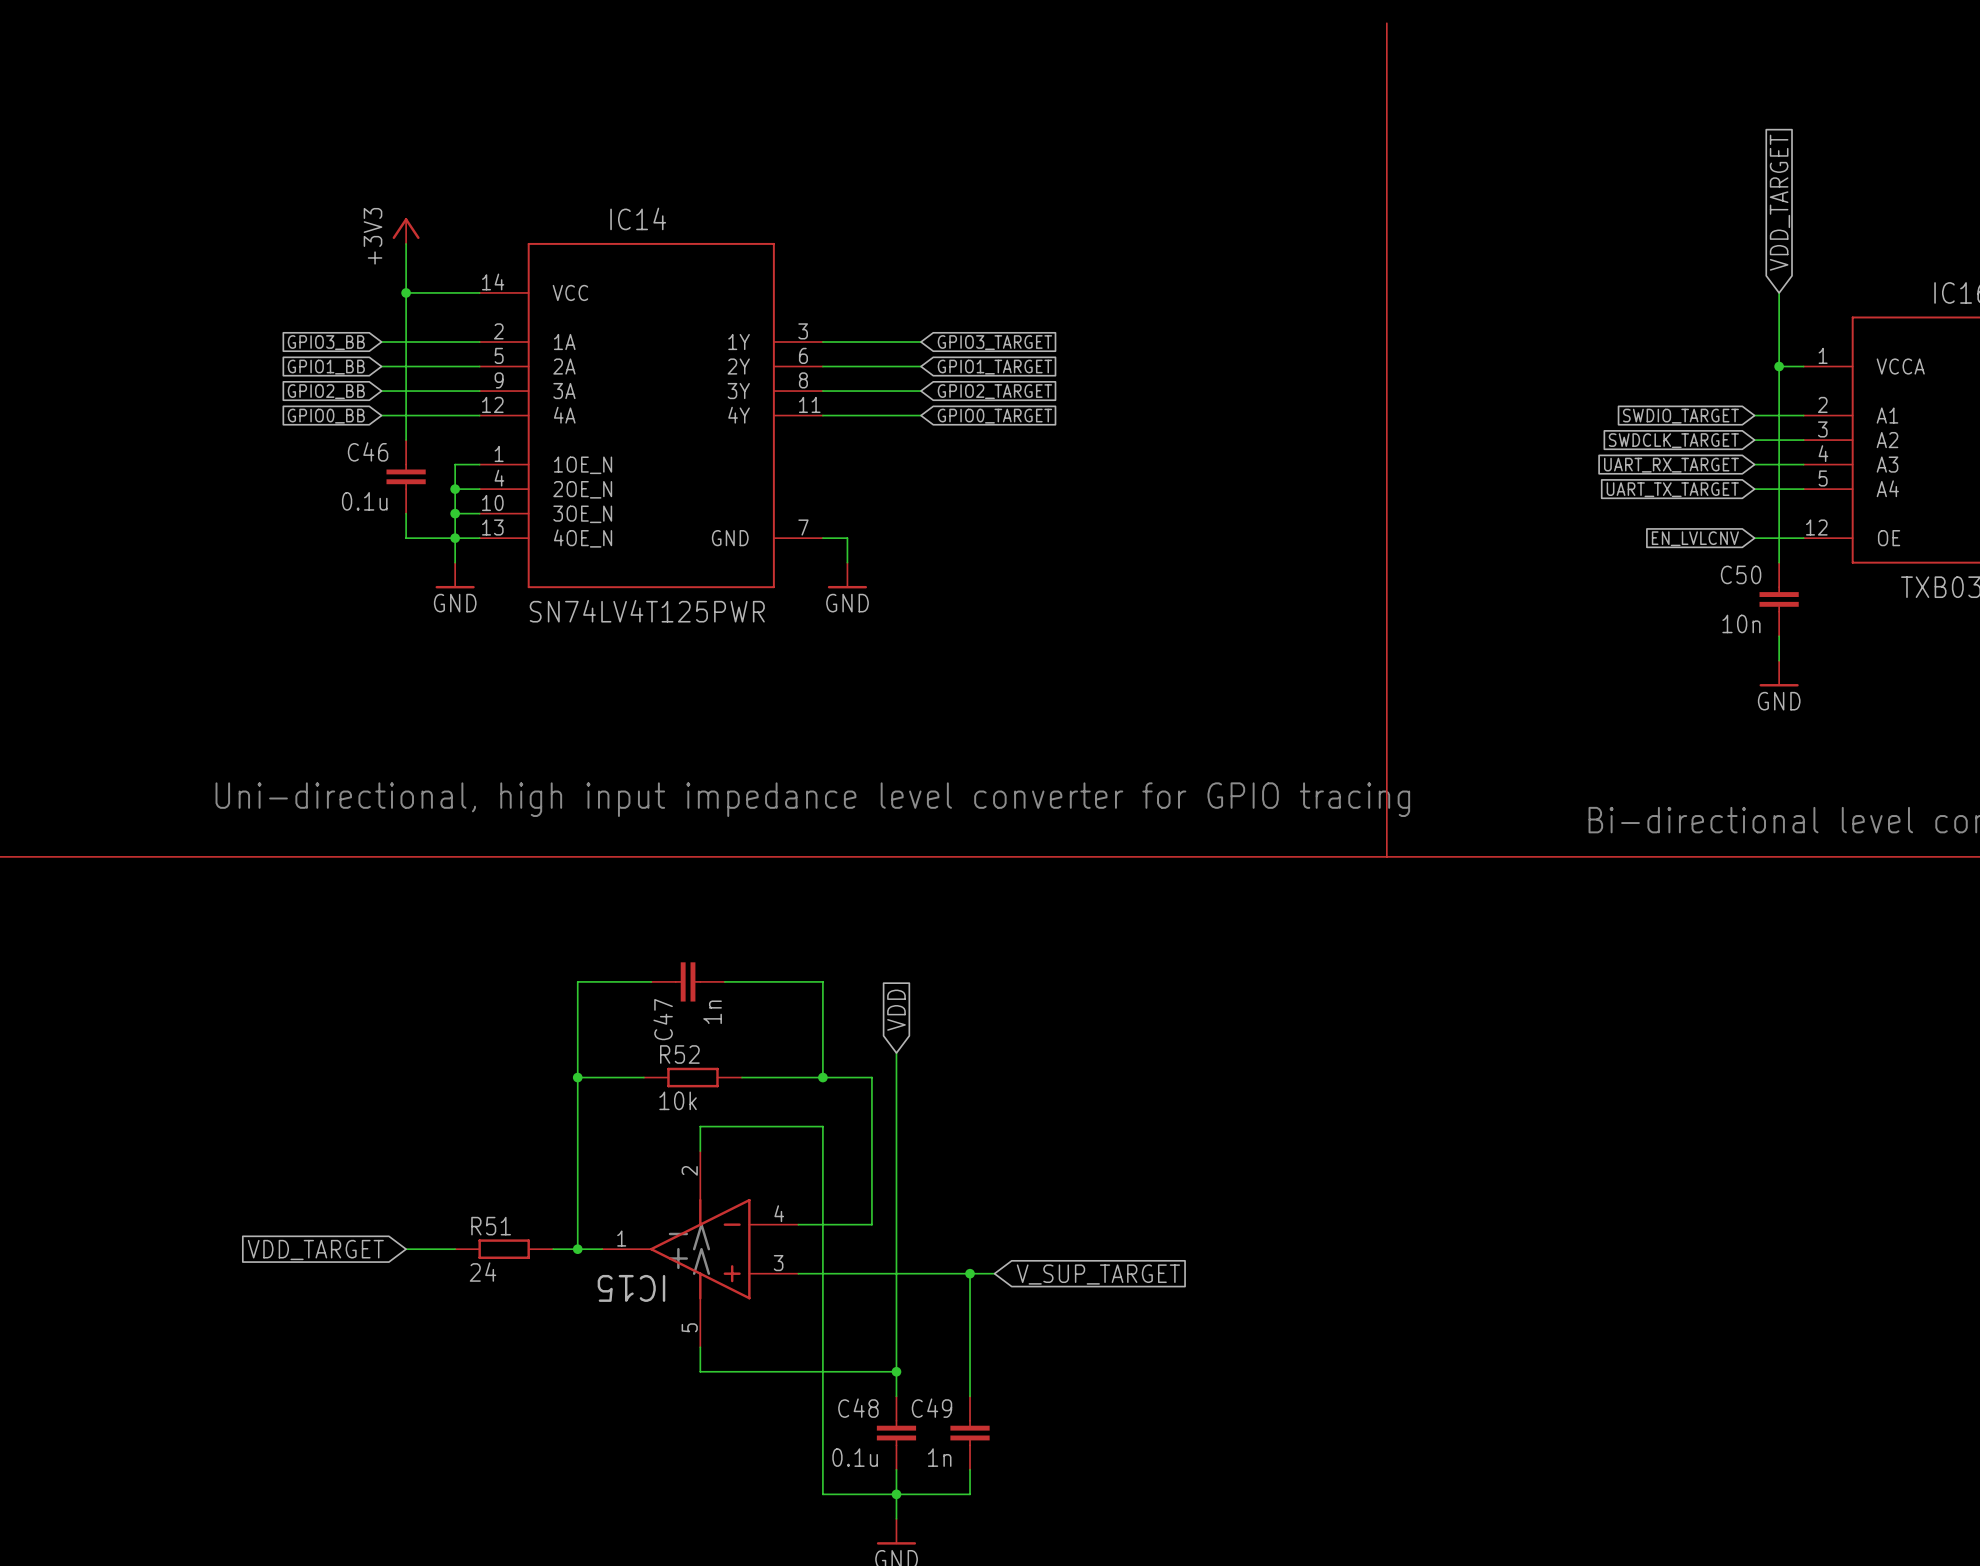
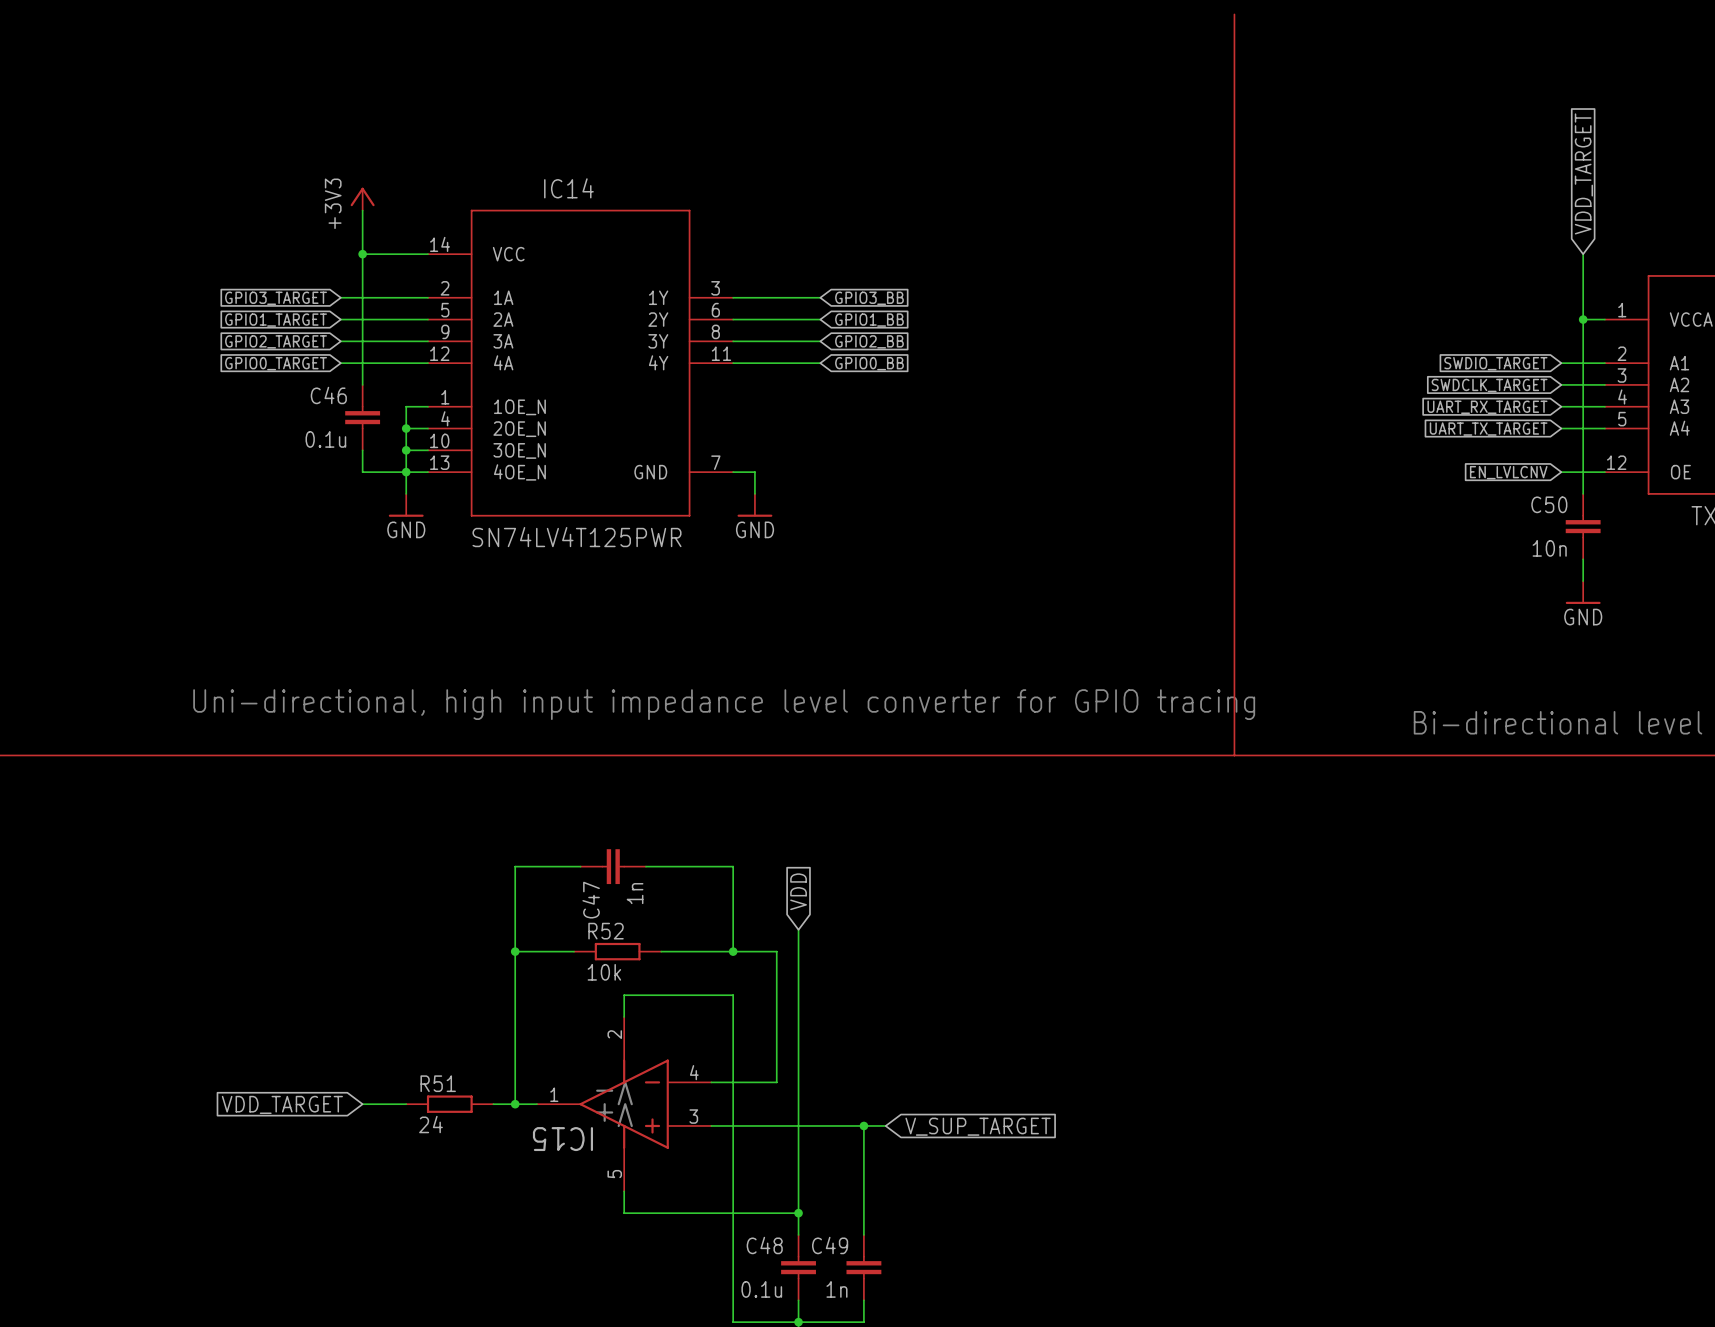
global label: GPIO3_BB (326, 342) -> GPIO3_TARGET (276, 298)
global label: GPIO3_TARGET (994, 342) -> GPIO3_BB (869, 298)
global label: GPIO1_BB (326, 367) -> GPIO1_TARGET (276, 320)
global label: GPIO1_TARGET (994, 367) -> GPIO1_BB (869, 320)
global label: GPIO2_BB (326, 391) -> GPIO2_TARGET (276, 341)
global label: GPIO2_TARGET (994, 391) -> GPIO2_BB (869, 341)
global label: GPIO0_BB (326, 416) -> GPIO0_TARGET (276, 363)
global label: GPIO0_TARGET (994, 416) -> GPIO0_BB (869, 363)

